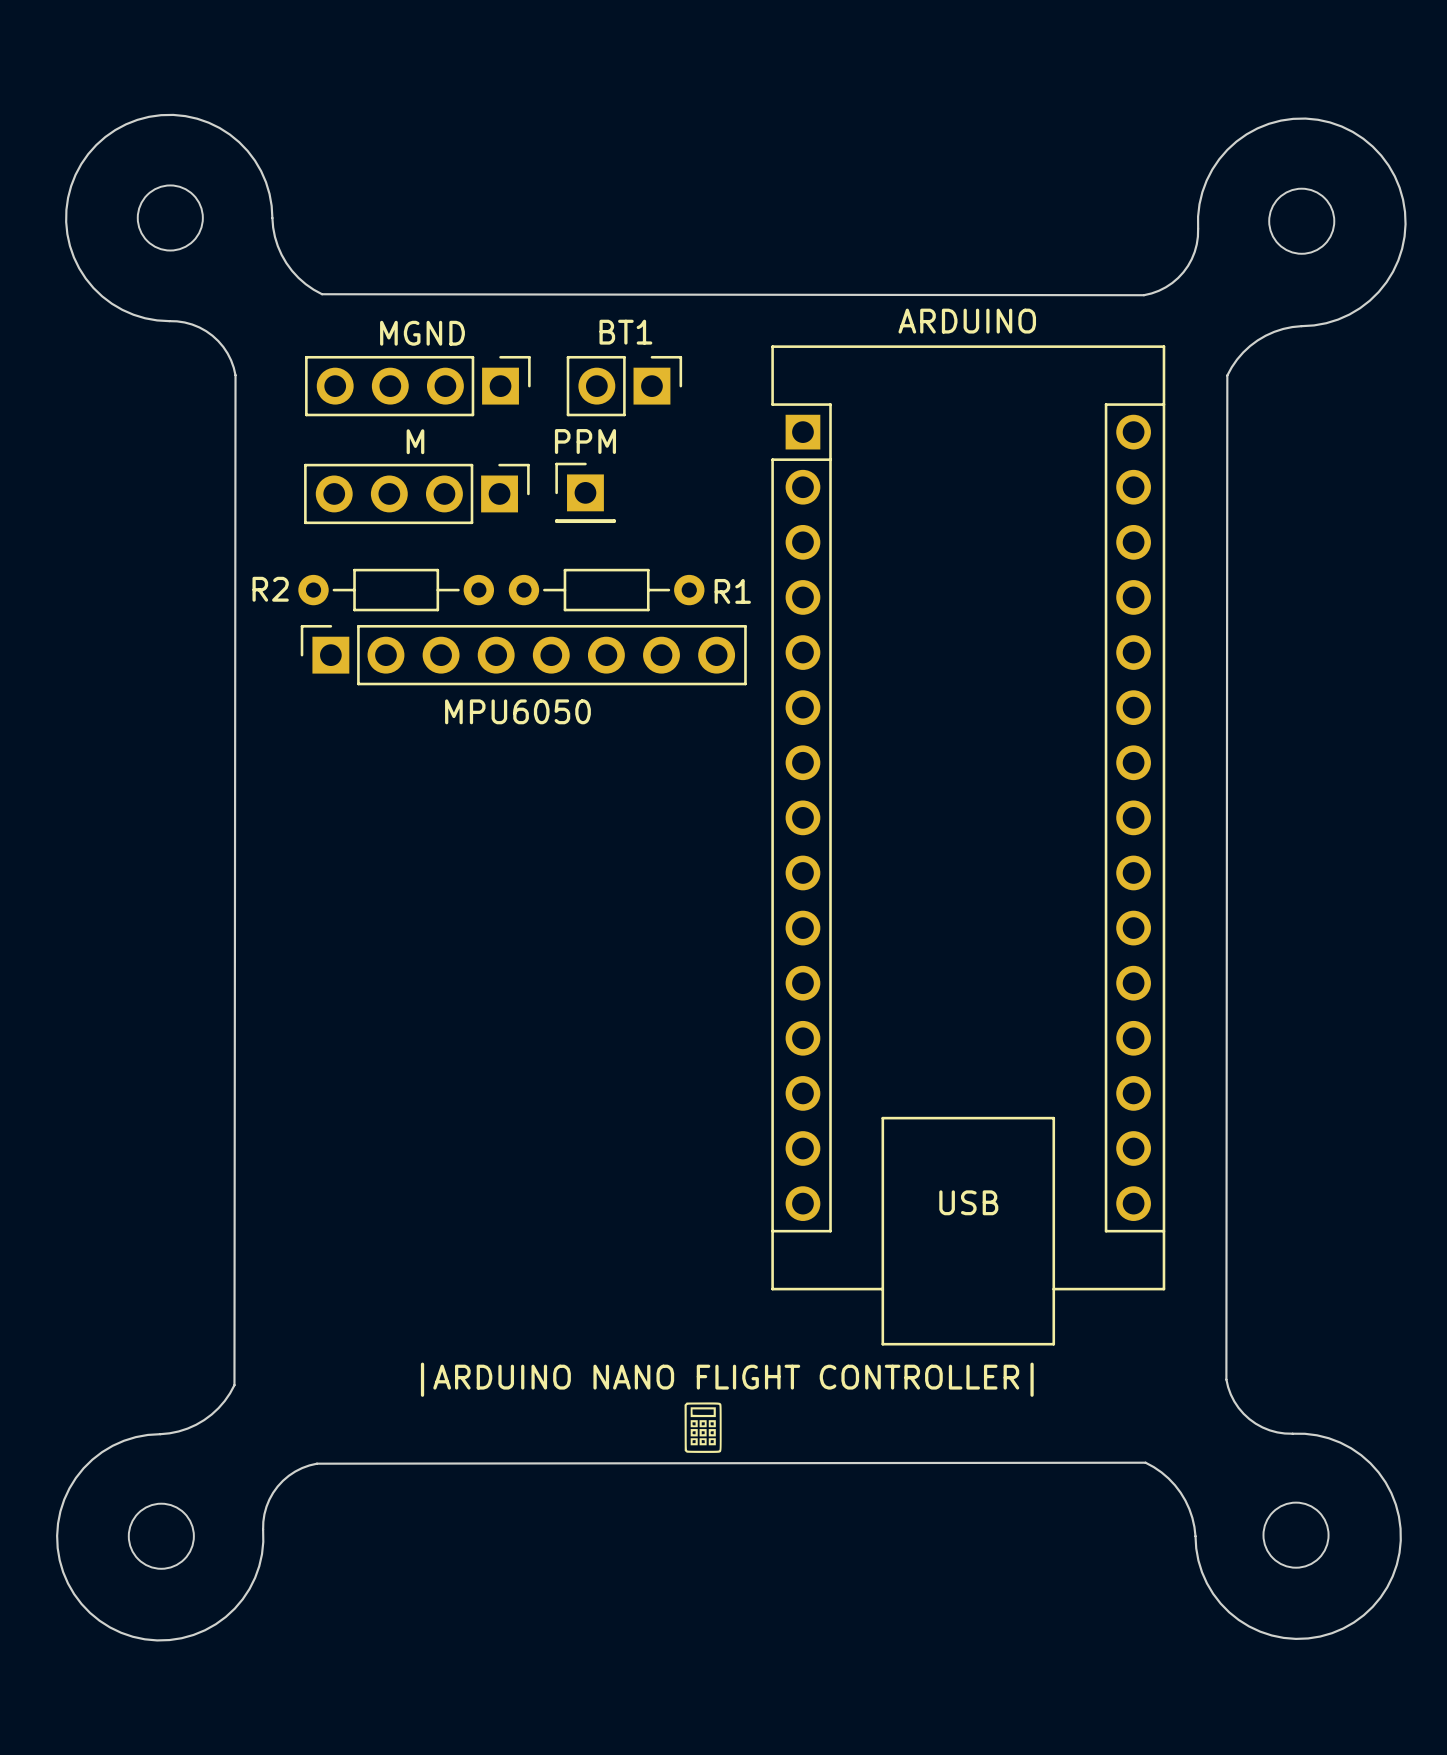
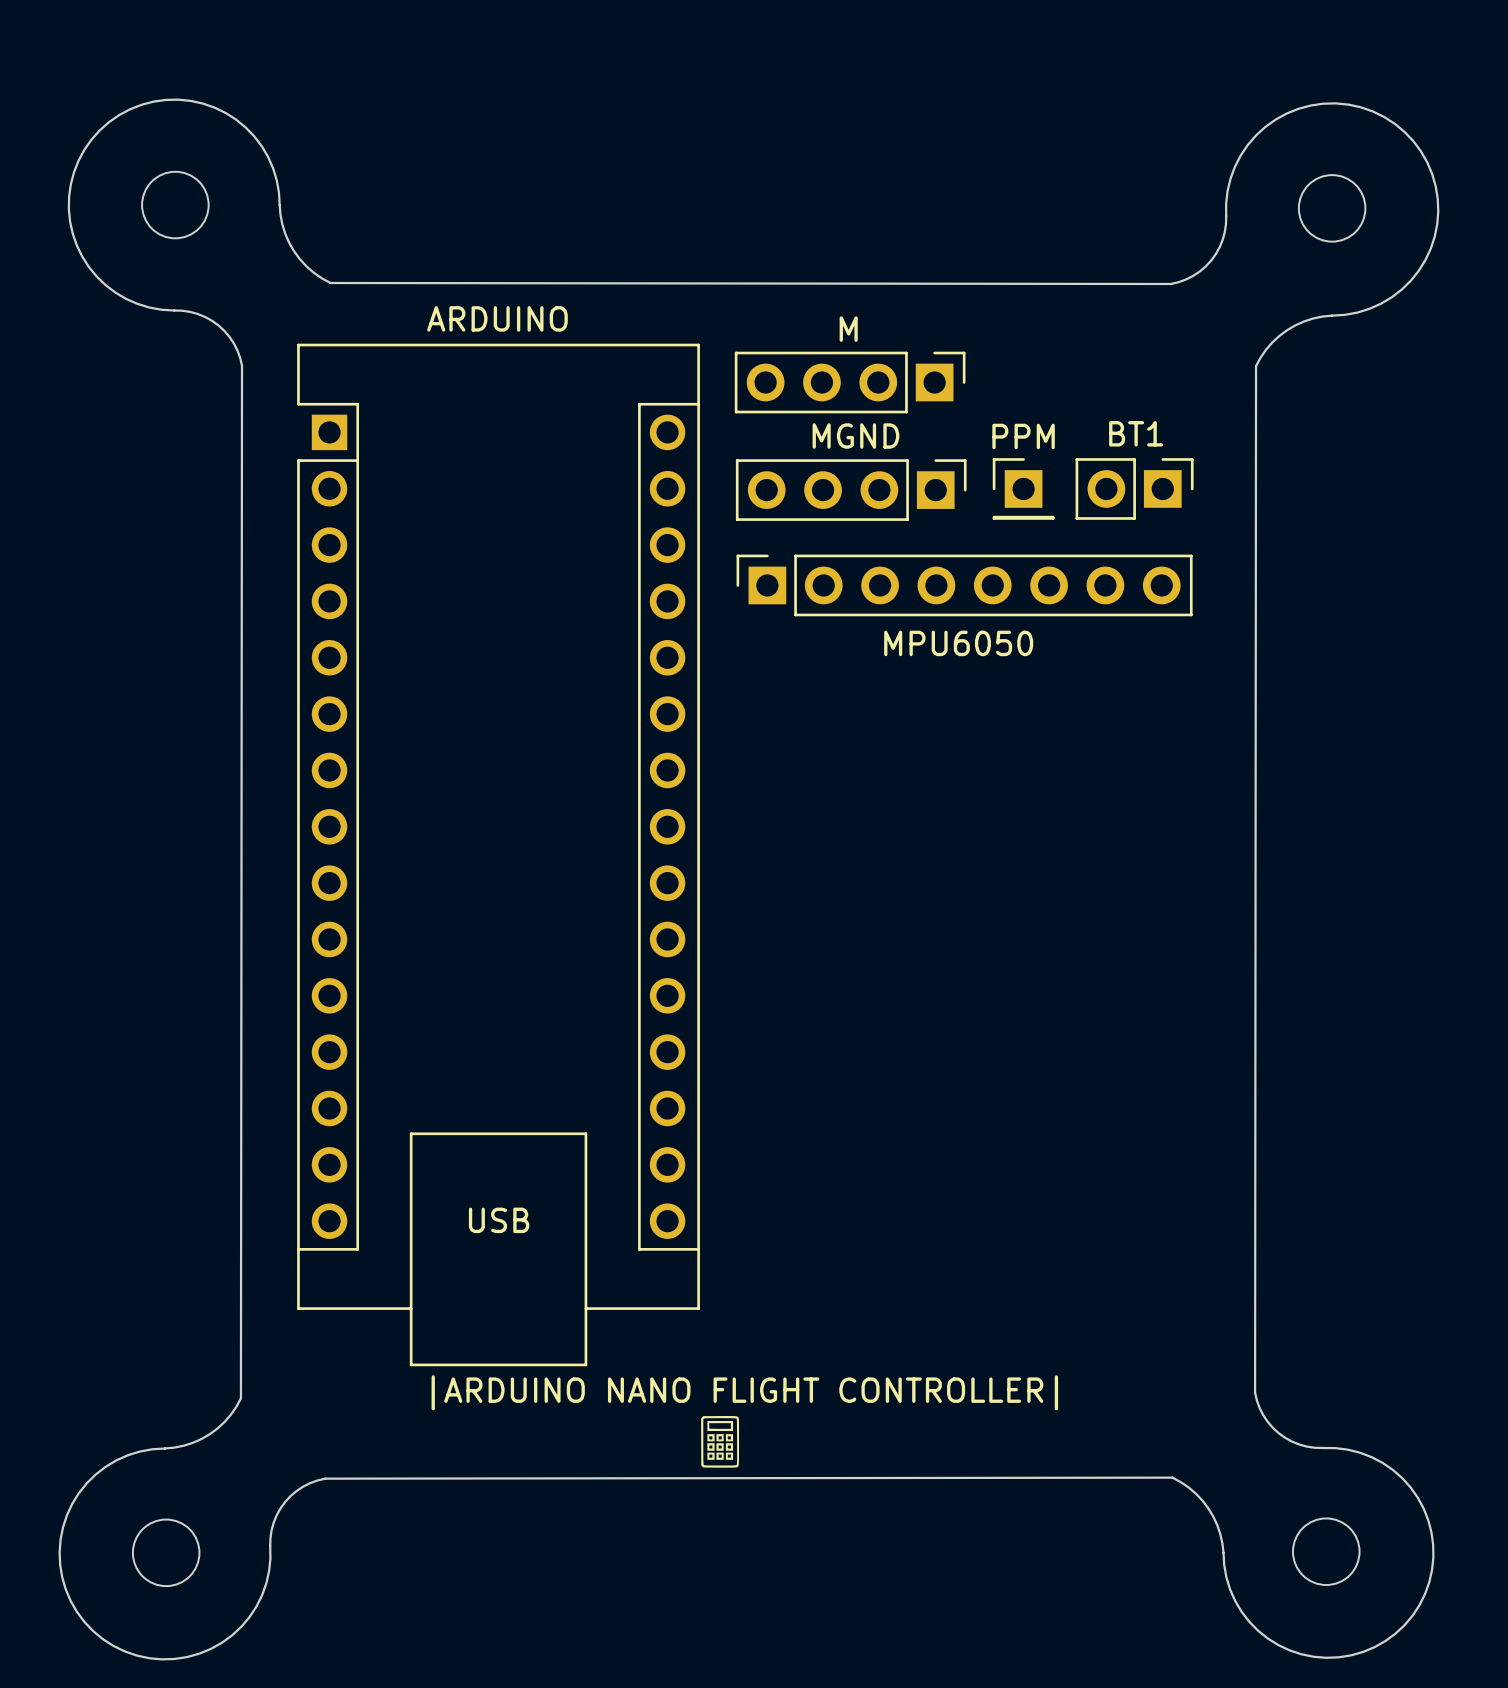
MGND position: (417, 386) -> (851, 490)
BT1 position: (624, 386) -> (1134, 488)
PPM position: (585, 492) -> (1023, 488)
M position: (416, 493) -> (850, 382)
R2: (396, 590) -> none
R1: (606, 590) -> none
MPU6050 position: (523, 655) -> (964, 585)
ARDUINO position: (968, 845) -> (498, 854)

